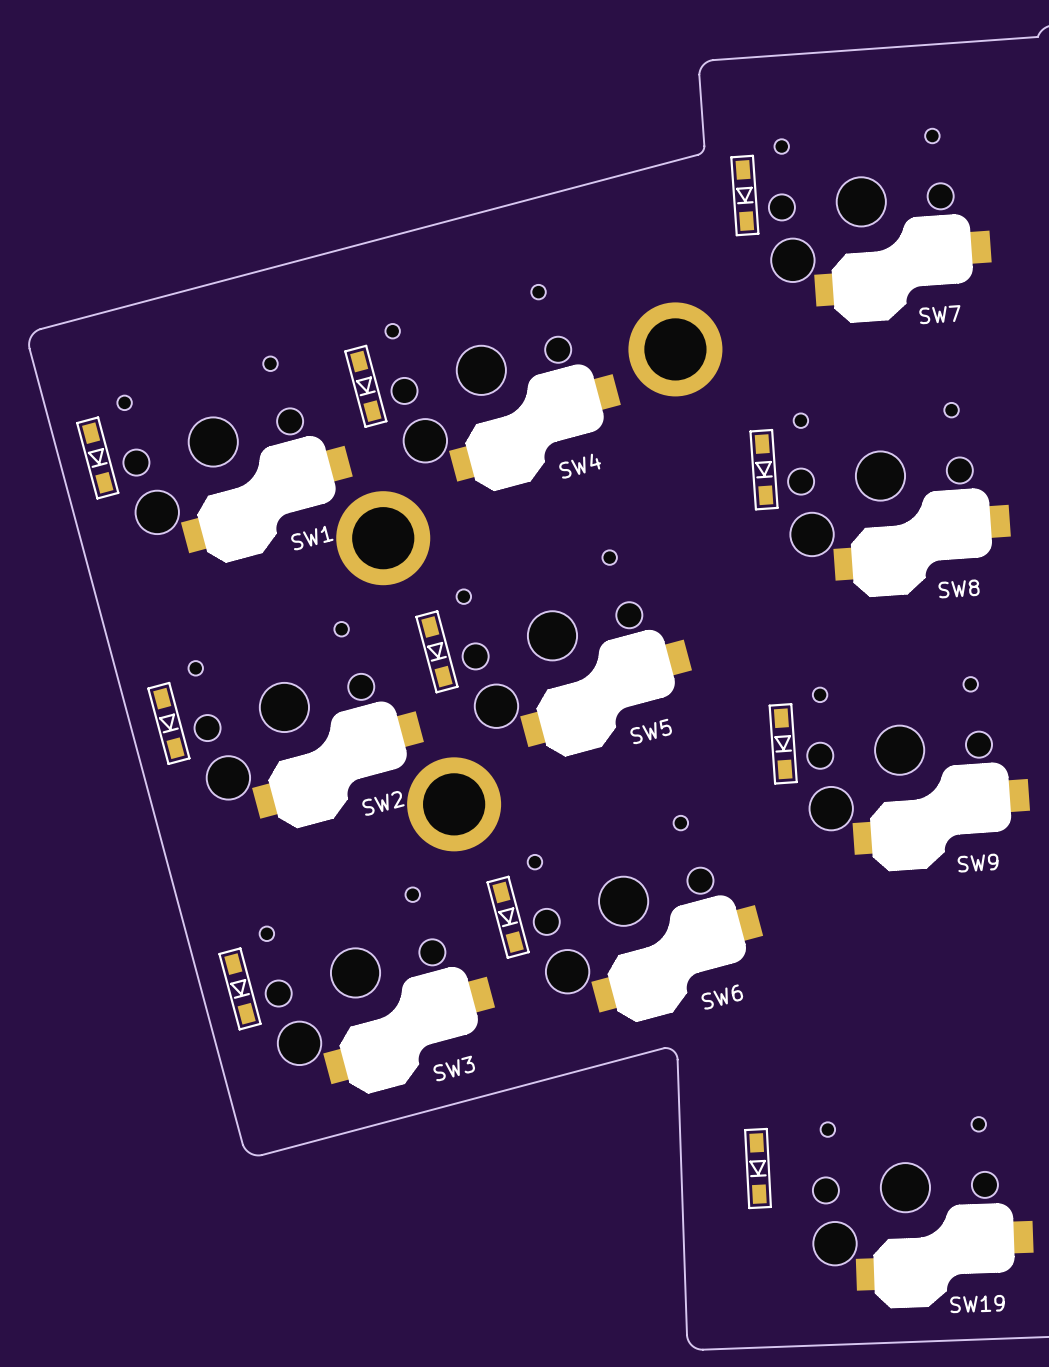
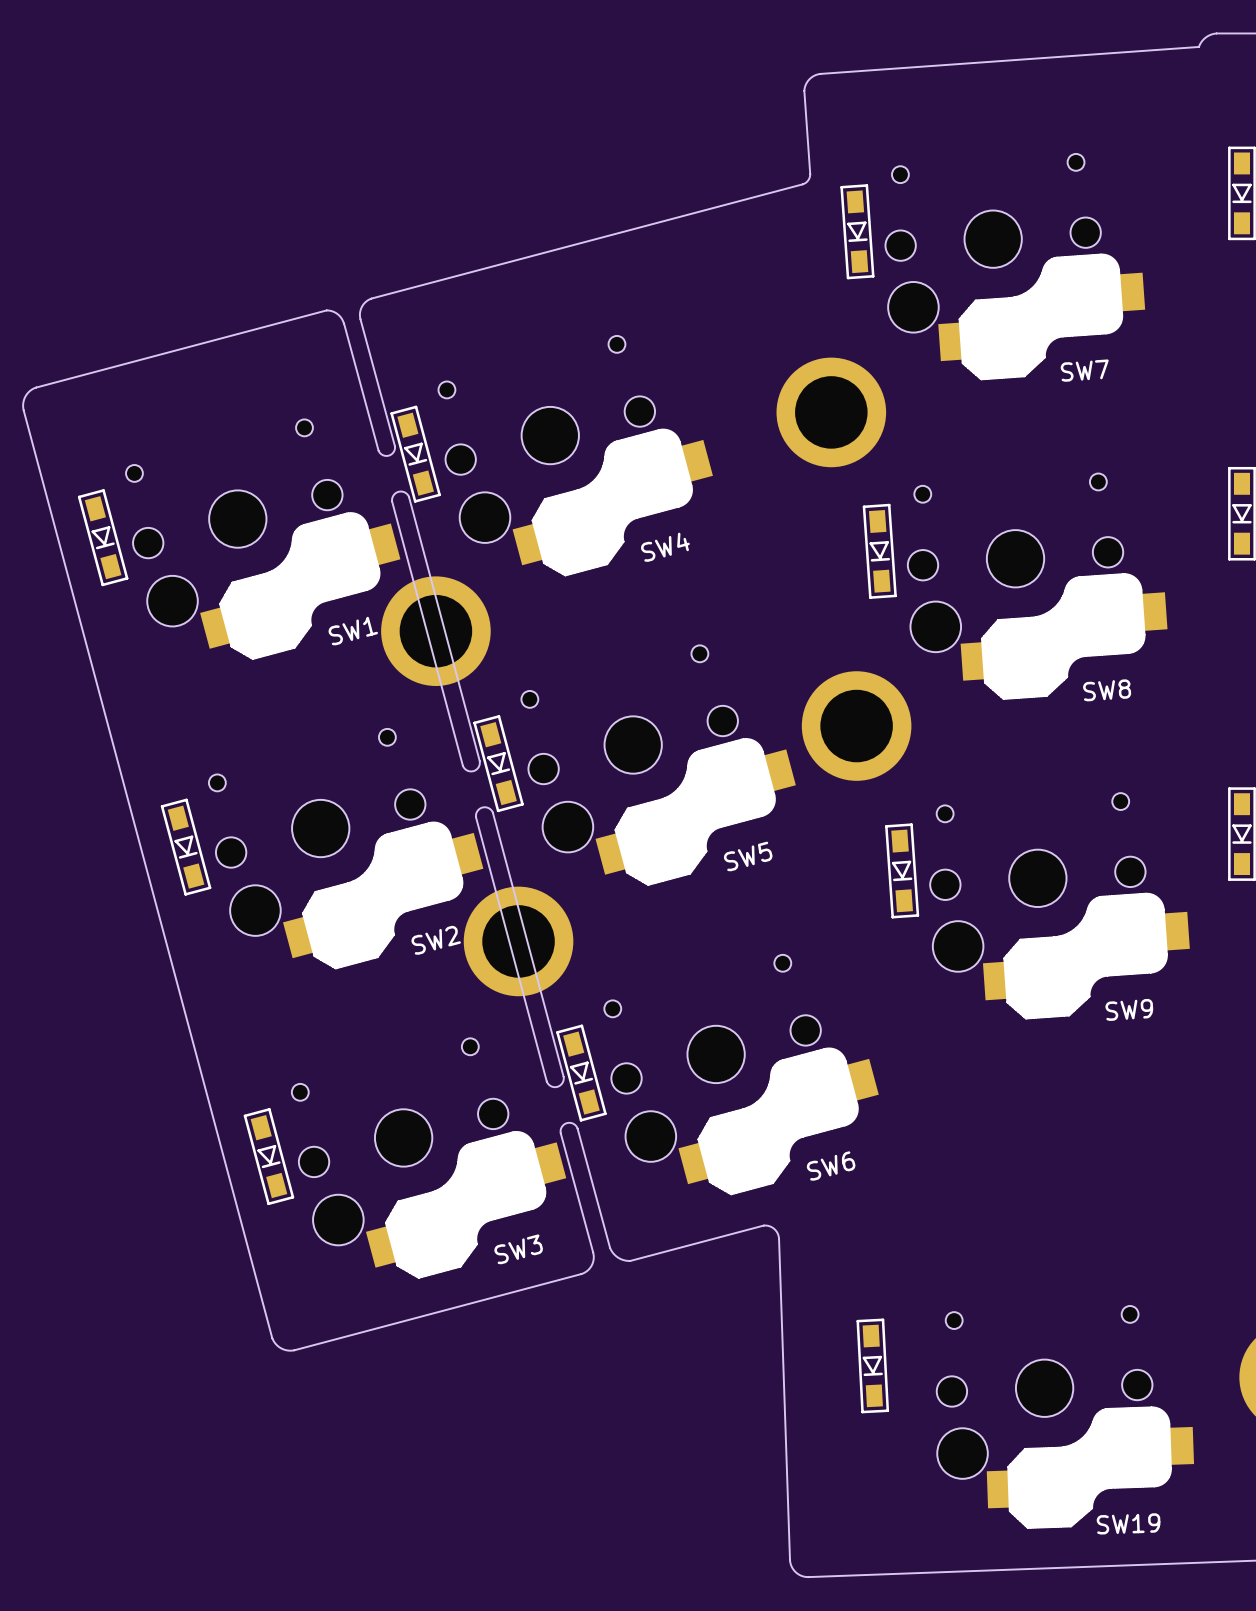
board edge: (697, 154) (40, 329) -> (802, 184) (367, 300) (361, 308) (360, 317) (395, 446) (393, 451) (388, 455) (383, 455) (378, 450) (344, 323)
board edge: none -> (343, 323) (337, 314) (326, 310) (36, 387)
part position: (675, 349) -> (831, 412)
board edge: none -> (408, 496) (479, 761) (478, 767) (473, 771) (467, 770) (462, 765) (392, 501) (393, 495) (398, 491) (404, 492) (408, 496)
part: none -> (856, 726)
board edge: none -> (492, 812) (563, 1076) (562, 1083) (557, 1086) (550, 1086) (546, 1081) (475, 817) (477, 810) (482, 807) (488, 807) (492, 812)
board edge: (664, 1048) (261, 1155) -> (763, 1225) (630, 1260) (620, 1258) (610, 1247) (577, 1128) (573, 1123) (567, 1123) (561, 1126) (560, 1133) (593, 1254) (592, 1263) (587, 1270) (581, 1274) (294, 1350)

